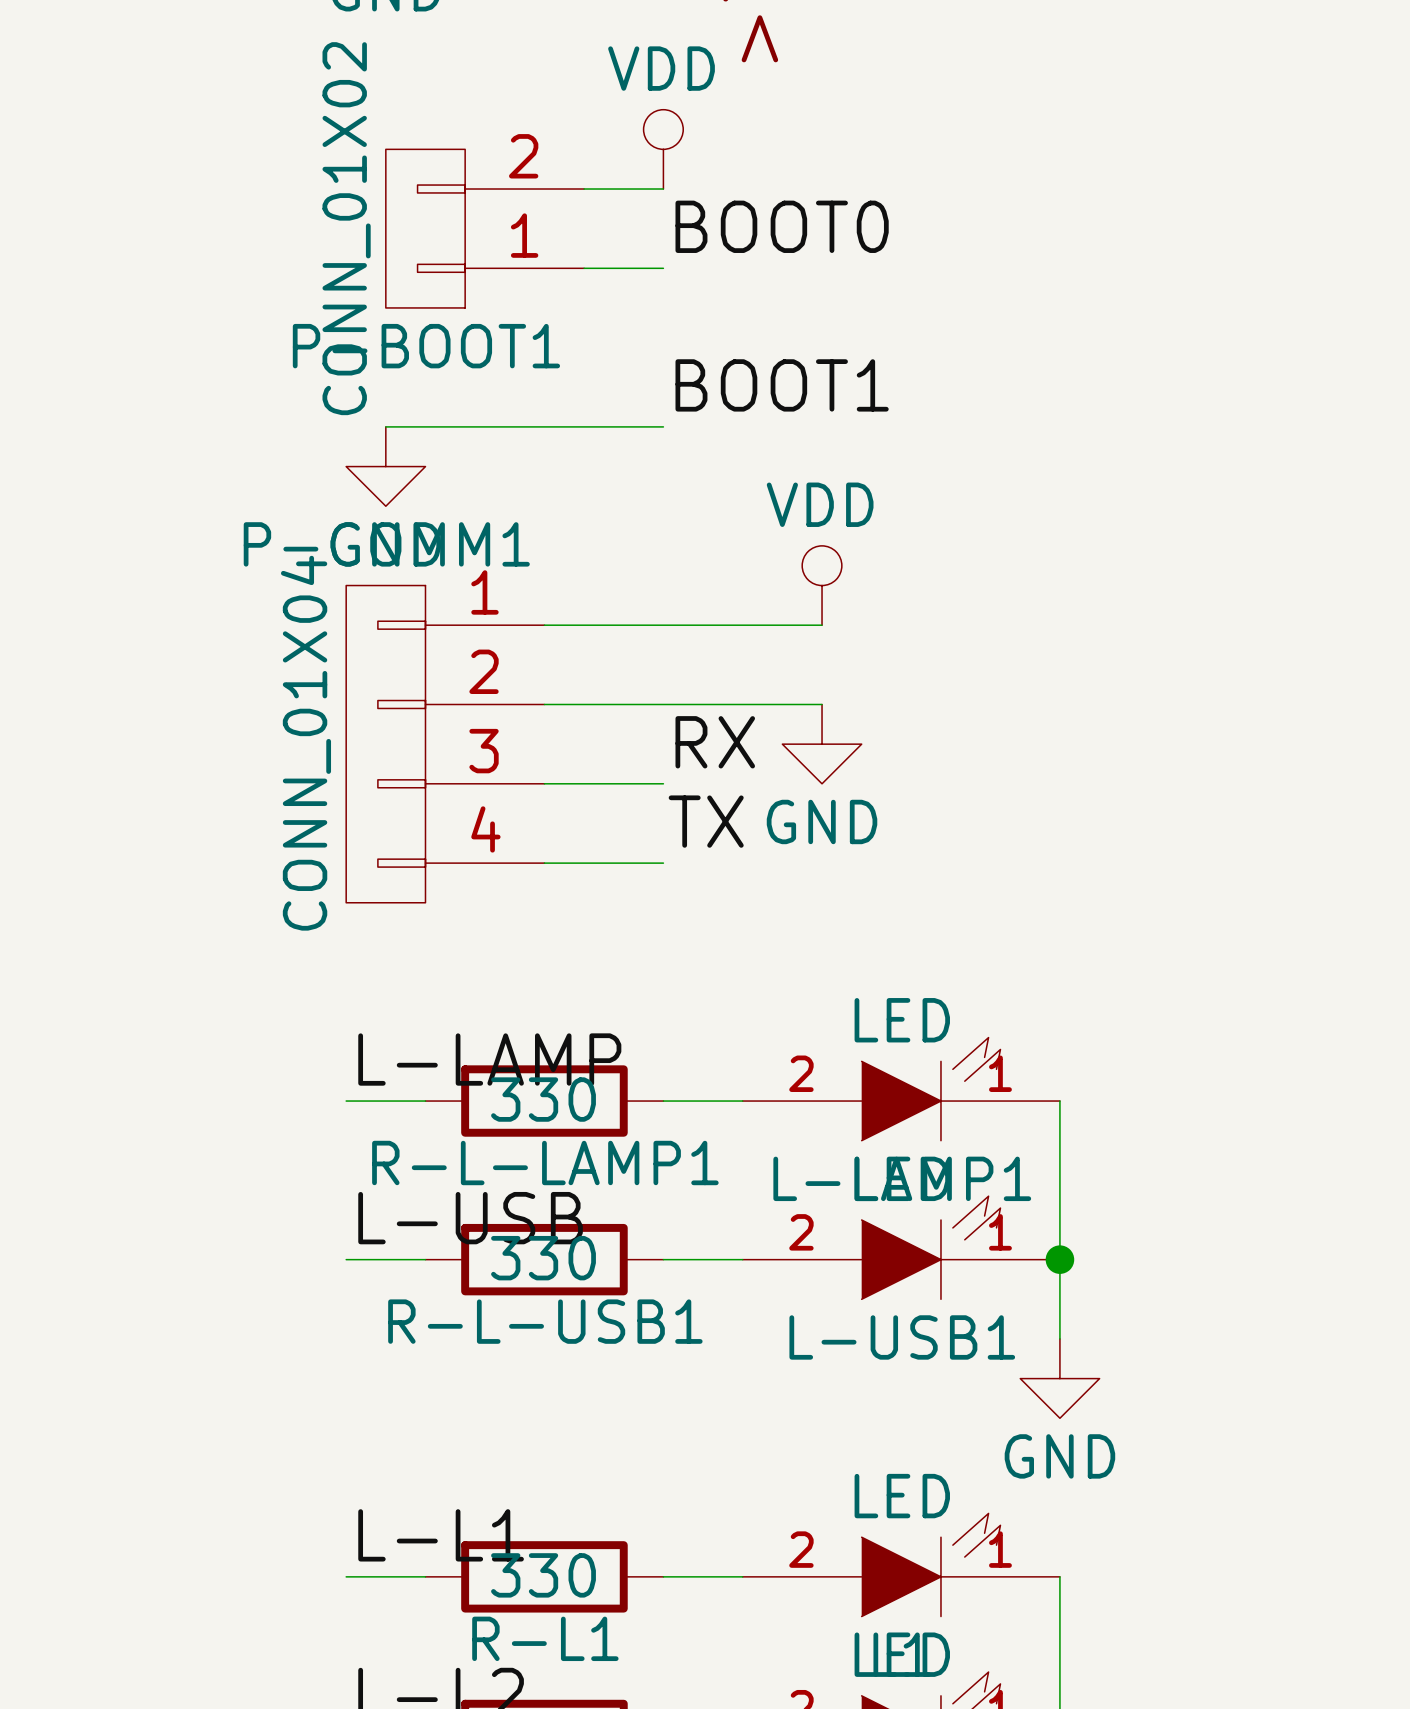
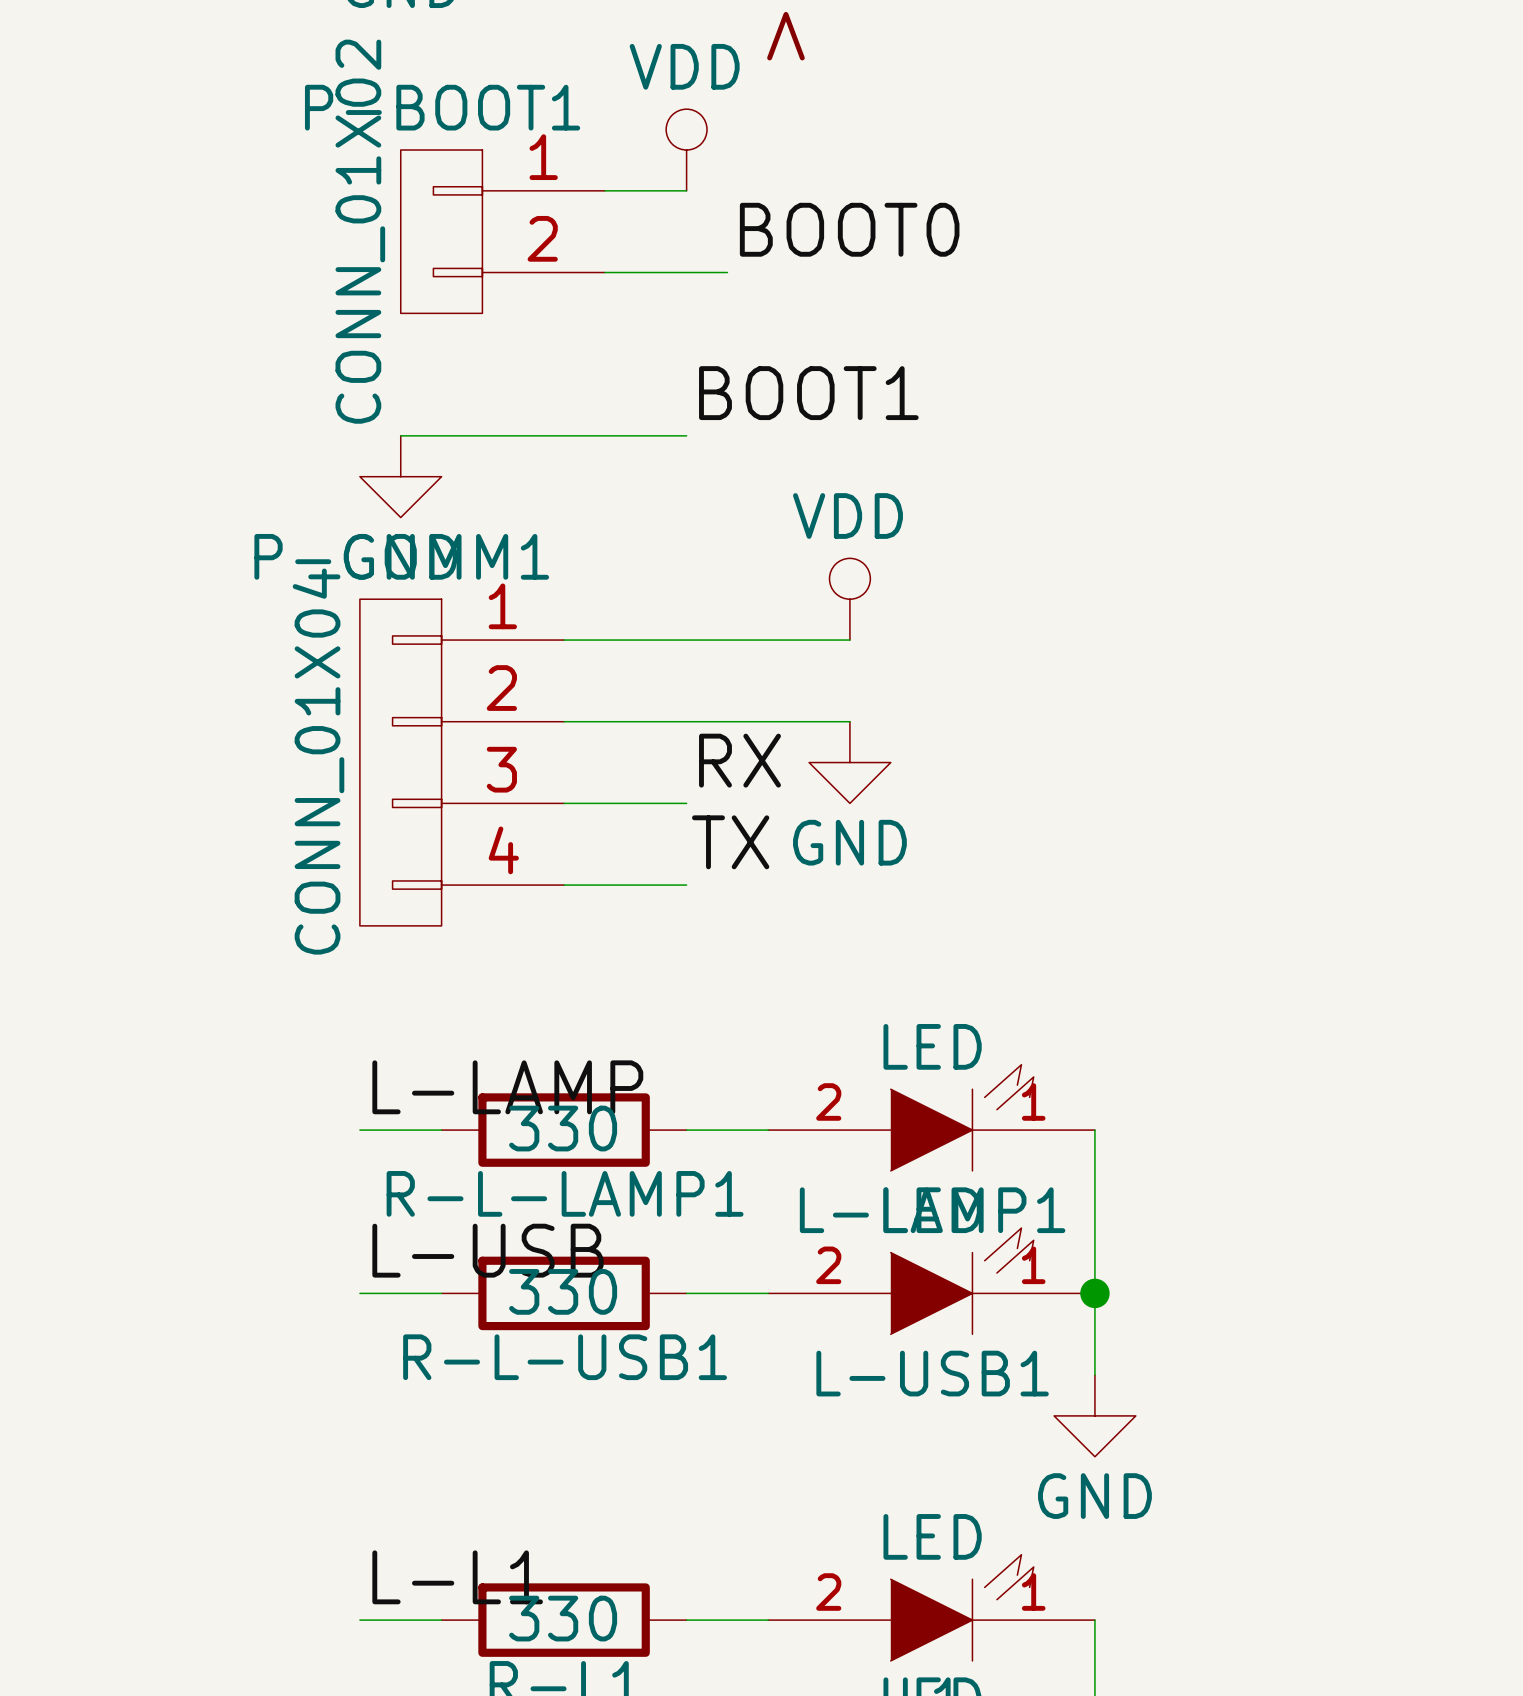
label position: BOOT0 (782, 226) -> BOOT0 (849, 229)
P-BOOT1 flip: as is (425, 228) -> up-down (441, 231)
wire: none -> (686, 272) (727, 272)

